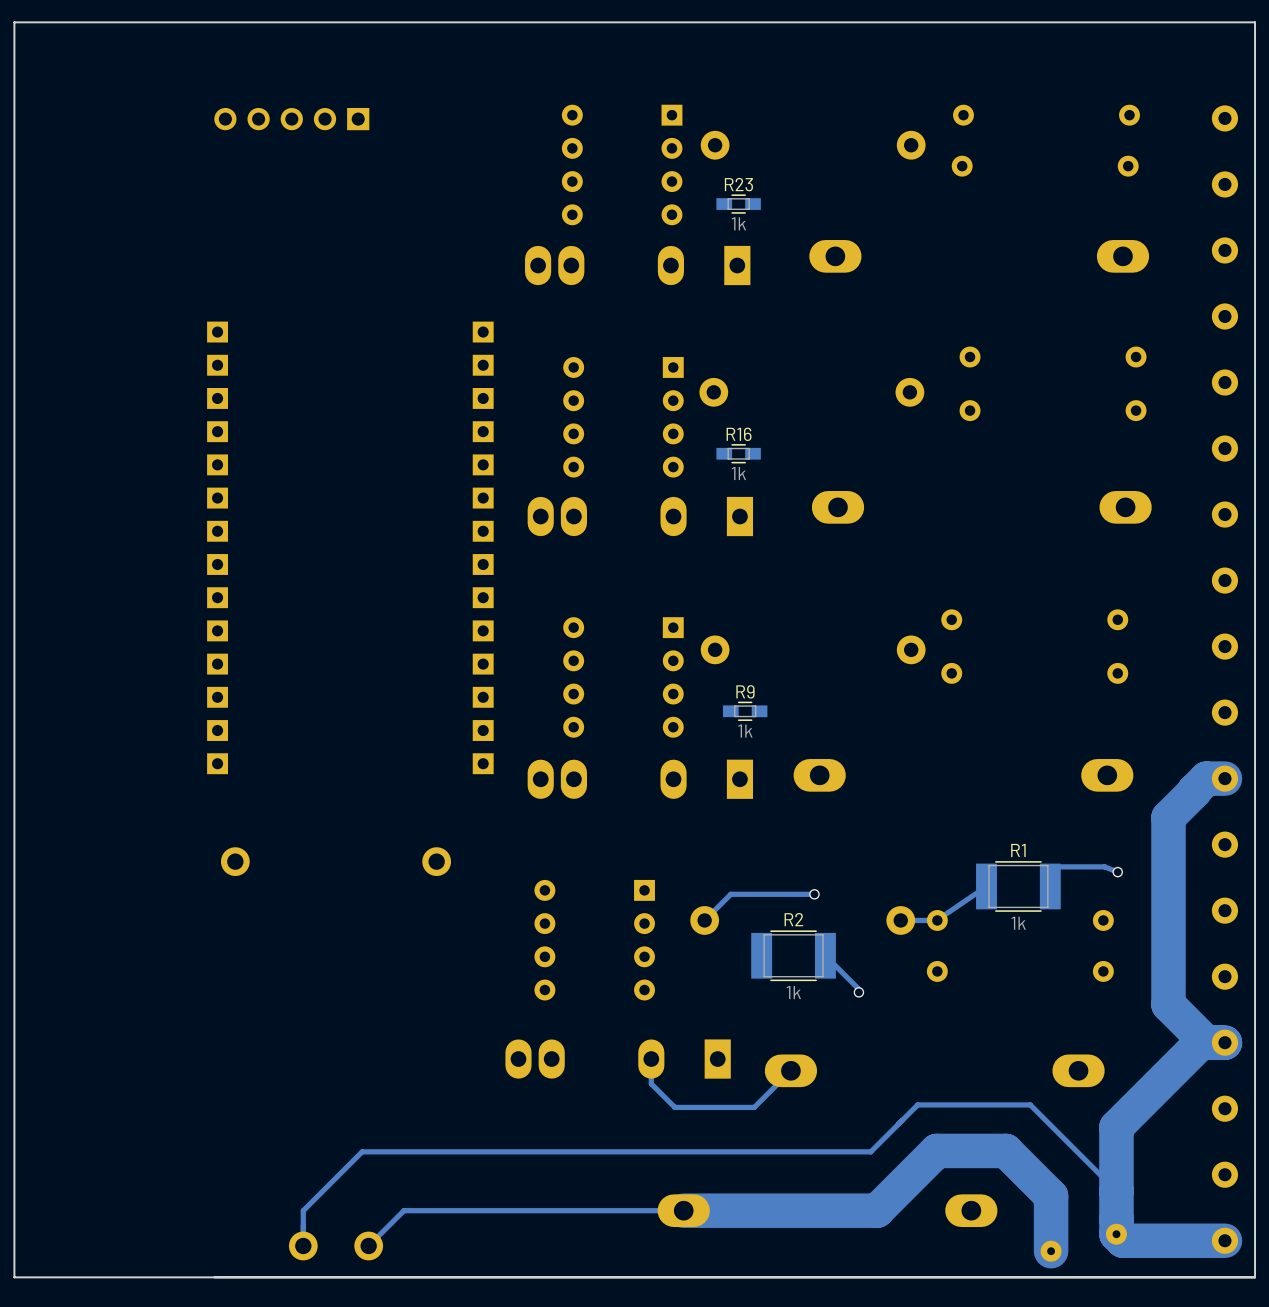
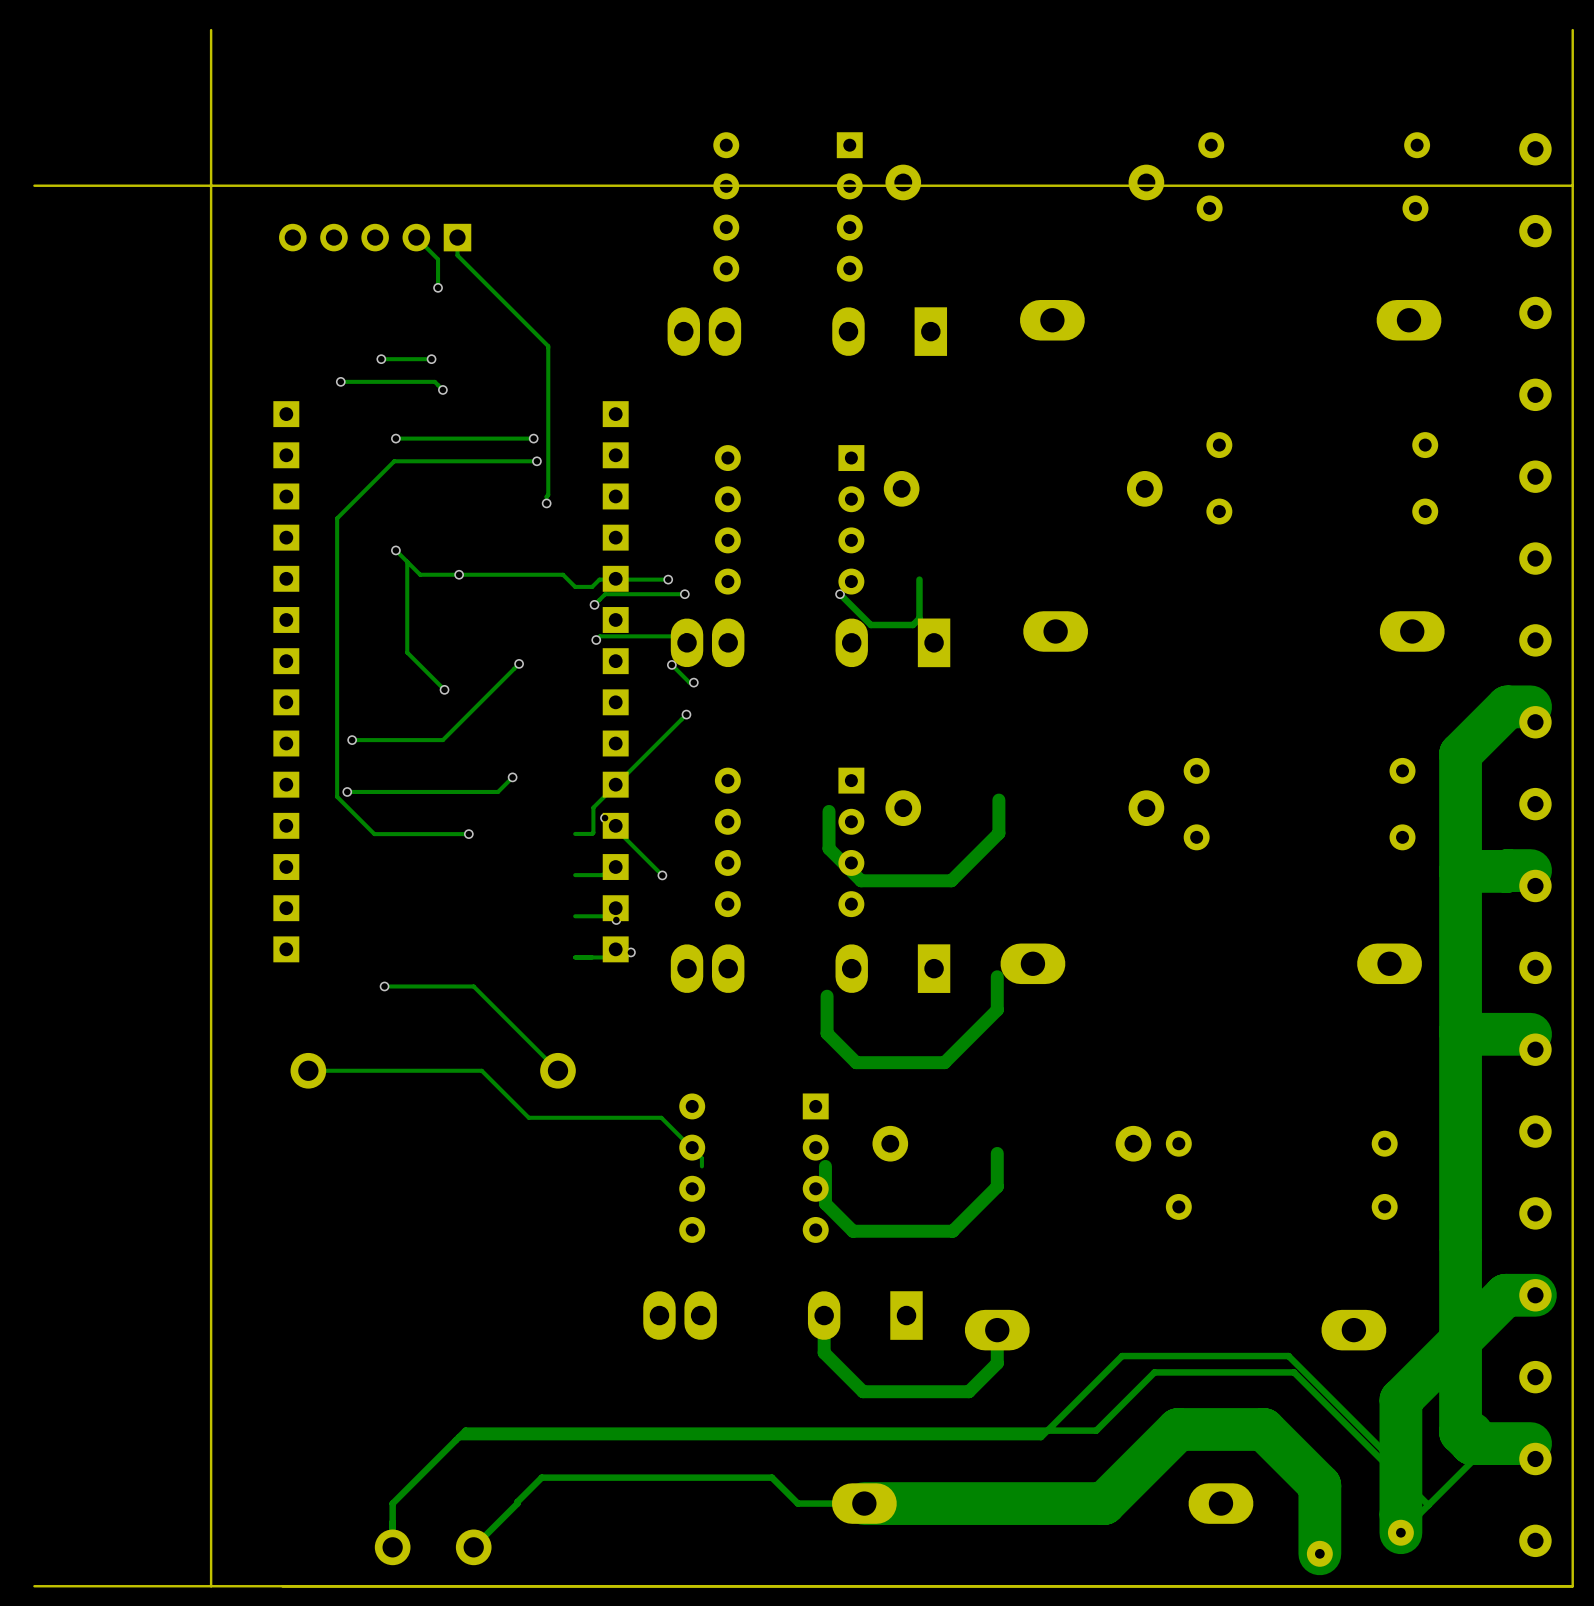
board edge: none -> (211, 30) (211, 1586)
board edge: (1255, 22) (14, 22) (14, 1277) -> none
part position: (291, 119) -> (375, 237)
board edge: none -> (1572, 185) (34, 185)
track: none -> (416, 237) (438, 259) (438, 287)
track: none -> (457, 237) (457, 255) (548, 346) (548, 494) (546, 503)
R23: 1k (738, 204) -> none
via: none -> (438, 287)
via: none -> (381, 359)
track: none -> (431, 359) (381, 359)
via: none -> (431, 359)
track: none -> (340, 381) (434, 381) (442, 389)
via: none -> (340, 381)
via: none -> (442, 389)
via: none -> (395, 438)
track: none -> (533, 438) (395, 438)
via: none -> (533, 438)
track: none -> (536, 461) (394, 461) (337, 518) (337, 796) (374, 834) (468, 834)
via: none -> (536, 461)
via: none -> (546, 503)
track: none -> (395, 550) (420, 574) (563, 574) (575, 586) (592, 586) (599, 579) (668, 579)
via: none -> (395, 550)
track: none -> (407, 561) (407, 652) (444, 689)
R16: 1k (738, 453) -> none
via: none -> (459, 574)
via: none -> (668, 579)
track: none -> (919, 579) (919, 618) (912, 625) (870, 625) (840, 594)
track: none -> (684, 594) (605, 594) (594, 604)
via: none -> (684, 594)
via: none -> (840, 594)
via: none -> (594, 604)
track: none -> (686, 636) (599, 636) (596, 640)
via: none -> (596, 640)
track: none -> (519, 663) (442, 740) (352, 740)
via: none -> (519, 663)
track: none -> (671, 664) (689, 682) (693, 682)
via: none -> (671, 664)
via: none -> (693, 682)
via: none -> (444, 689)
track: none -> (1530, 706) (1507, 706) (1460, 753) (1460, 1432) (1471, 1443)
track: none -> (686, 714) (593, 807) (593, 832) (575, 833)
via: none -> (686, 714)
via: none -> (352, 740)
track: none -> (512, 777) (498, 791) (347, 791)
via: none -> (512, 777)
via: none -> (347, 791)
track: none -> (998, 800) (998, 833) (951, 880) (861, 880) (829, 848) (829, 811)
track: none -> (605, 818) (662, 875)
via: none -> (605, 818)
via: none -> (468, 834)
track: none -> (1530, 870) (1460, 871)
track: none -> (605, 873) (602, 875) (575, 875)
via: none -> (662, 875)
R9: 1k (745, 711) -> none
track: none -> (575, 916) (612, 916) (616, 920)
via: none -> (616, 920)
track: none -> (630, 952) (625, 957) (575, 957)
via: none -> (630, 952)
track: (1224, 778) (1206, 778) (1168, 817) (1168, 1004) (1206, 1042) -> none
track: none -> (997, 976) (997, 1009) (944, 1062) (856, 1062) (827, 1033) (827, 996)
track: none -> (384, 986) (473, 986) (557, 1070)
via: none -> (384, 986)
track: none -> (1460, 1031) (1462, 1034) (1530, 1034)
track: none -> (308, 1070) (481, 1070) (528, 1117) (661, 1117) (701, 1158) (701, 1166)
track: (1051, 866) (1104, 866) (1117, 872) -> none
via: (1117, 872) -> none
track: (986, 886) (937, 920) (900, 920) -> none
R1: 1k (1018, 886) -> none
track: (814, 894) (730, 894) (704, 920) -> none
via: (814, 894) -> none
track: none -> (825, 1166) (825, 1203) (853, 1231) (952, 1231) (997, 1186) (997, 1153) (997, 1180)
R2: 1k (793, 955) -> none
track: (825, 955) (858, 989) (858, 992) -> none
via: (858, 992) -> none
track: (790, 1070) (754, 1107) (674, 1107) (651, 1083) -> (997, 1330) (997, 1363) (968, 1391) (863, 1391) (824, 1352) (824, 1315)
track: none -> (459, 1437) (1041, 1437) (1122, 1356) (1288, 1356) (1382, 1450) (1402, 1450) (1402, 1479) (1428, 1505)
track: (630, 1210) (403, 1210) -> (797, 1503) (771, 1477) (541, 1477) (517, 1503)
track: (1116, 1234) (1122, 1240) (1224, 1240) -> (1400, 1532) (1490, 1443) (1530, 1443) (1471, 1443)

